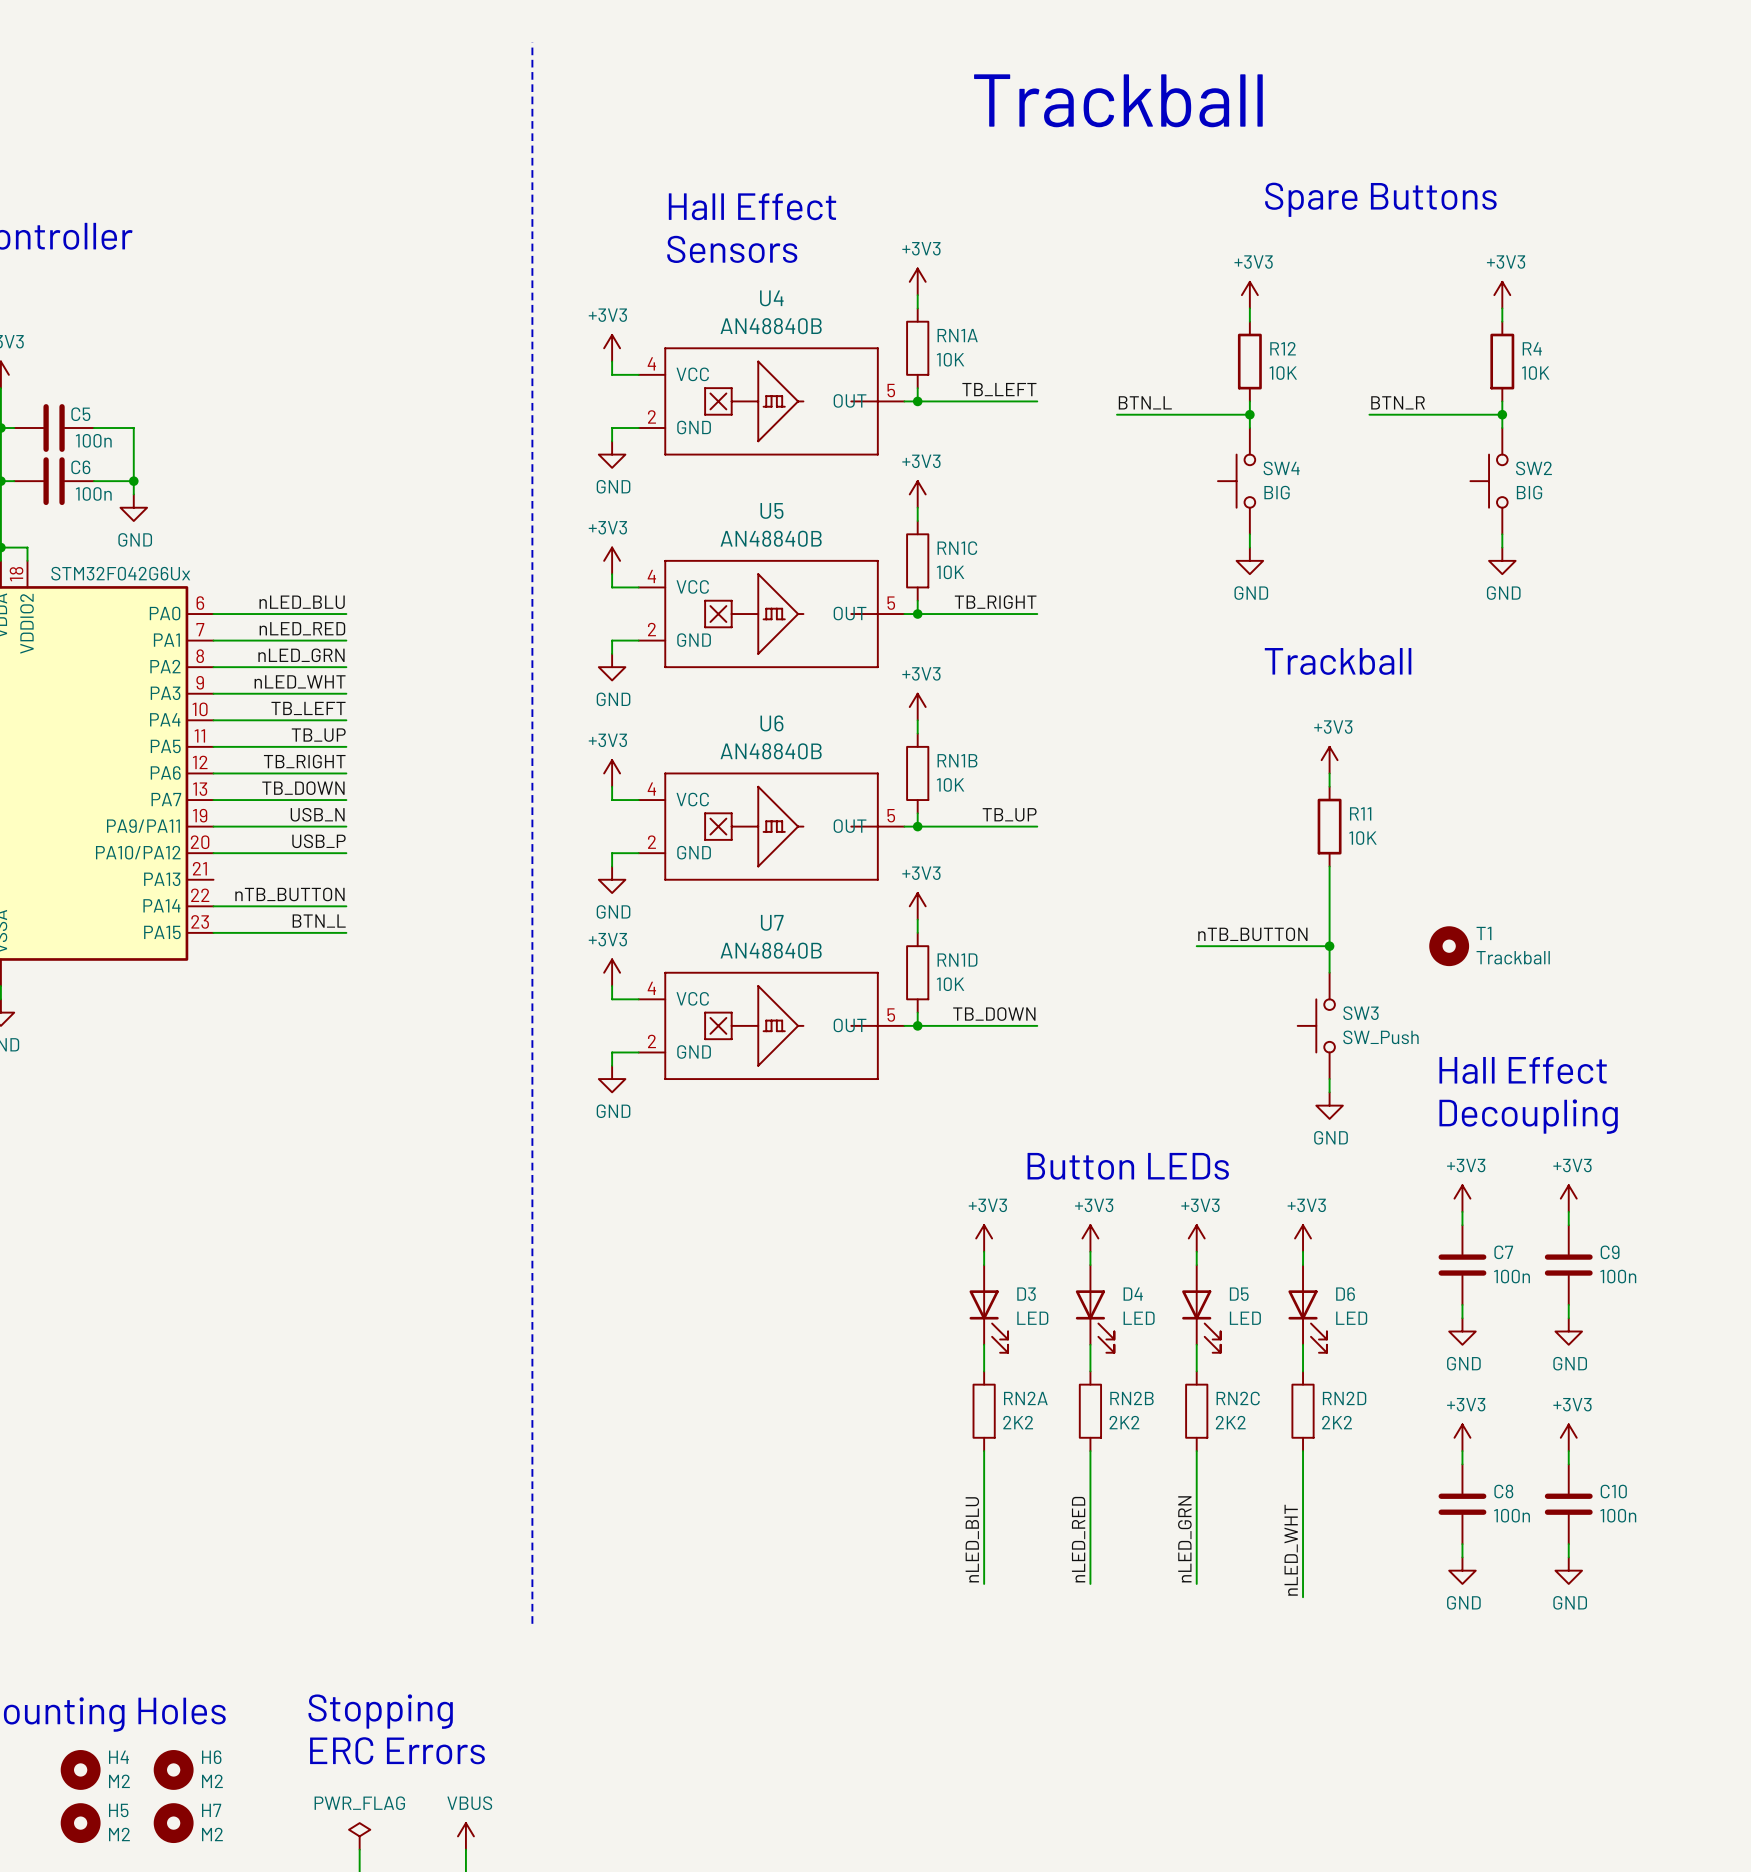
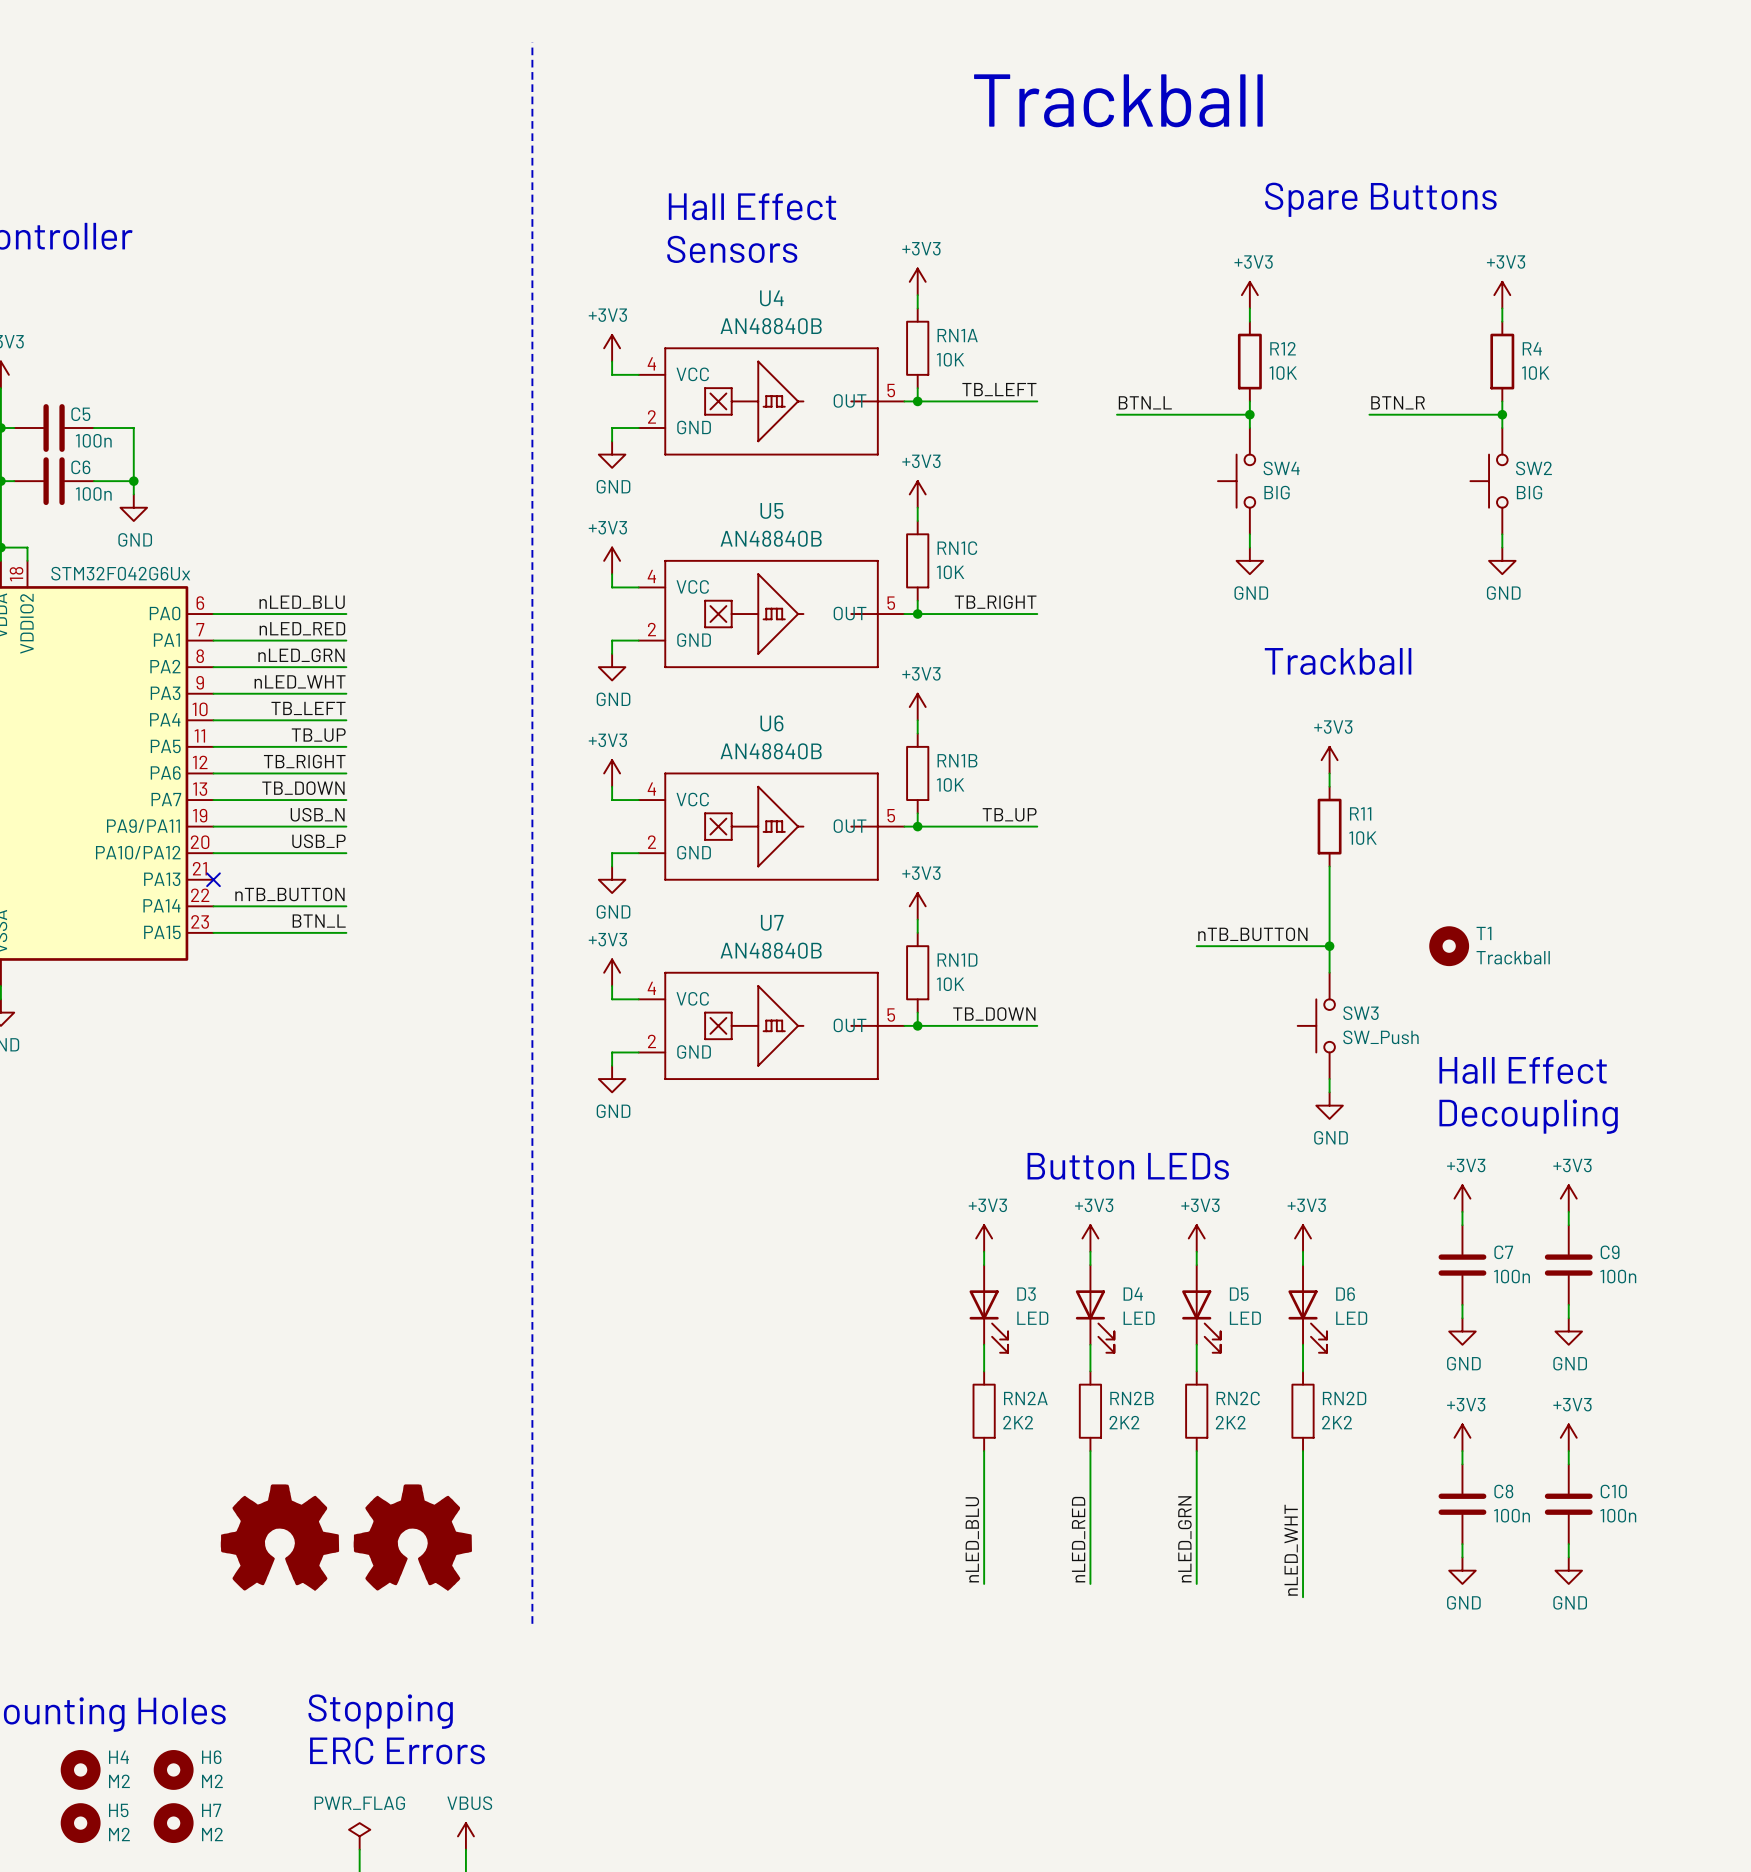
no-connect mark: none -> (213, 879)
part: none -> (279, 1537)
part: none -> (412, 1537)

